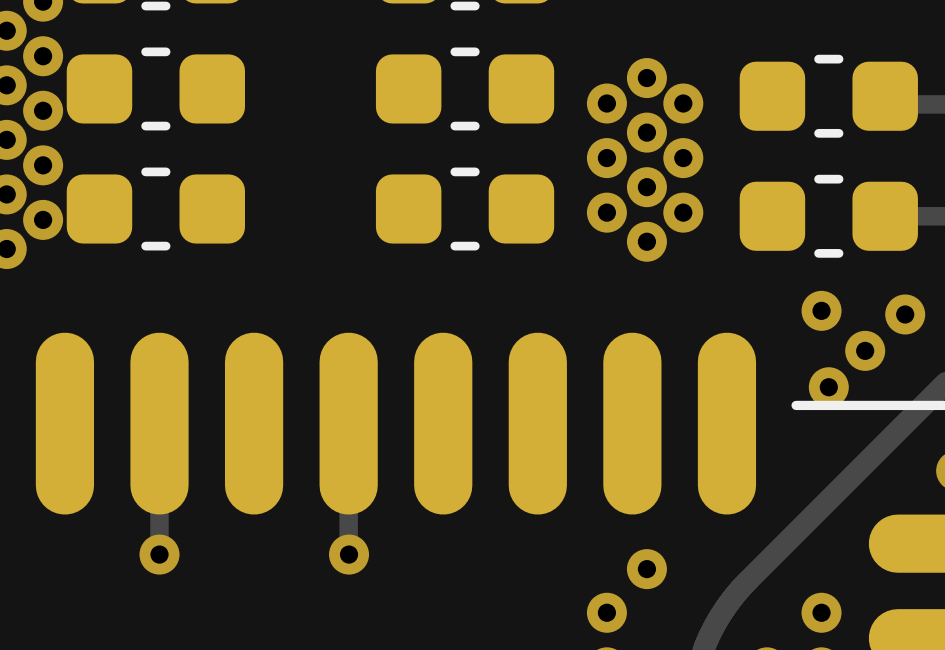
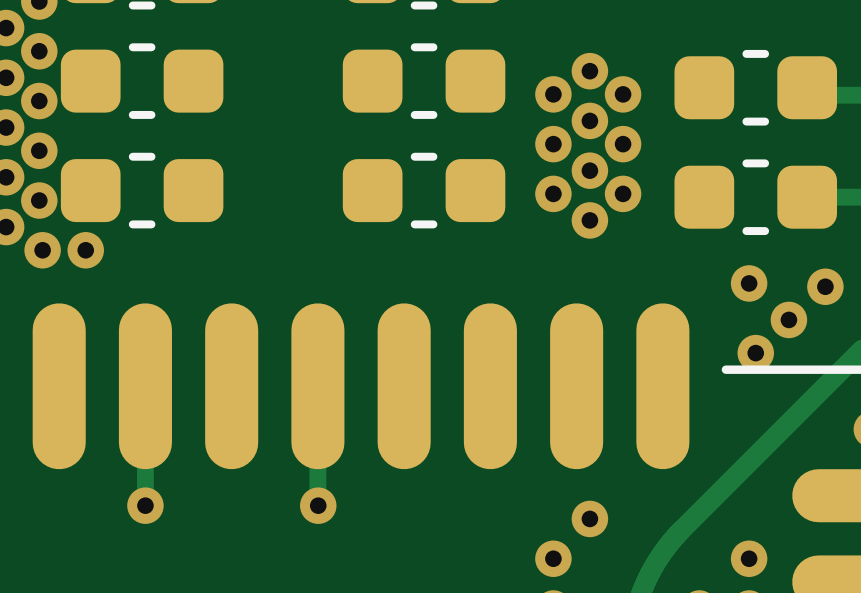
via: none -> (42, 250)
via: none -> (85, 250)

